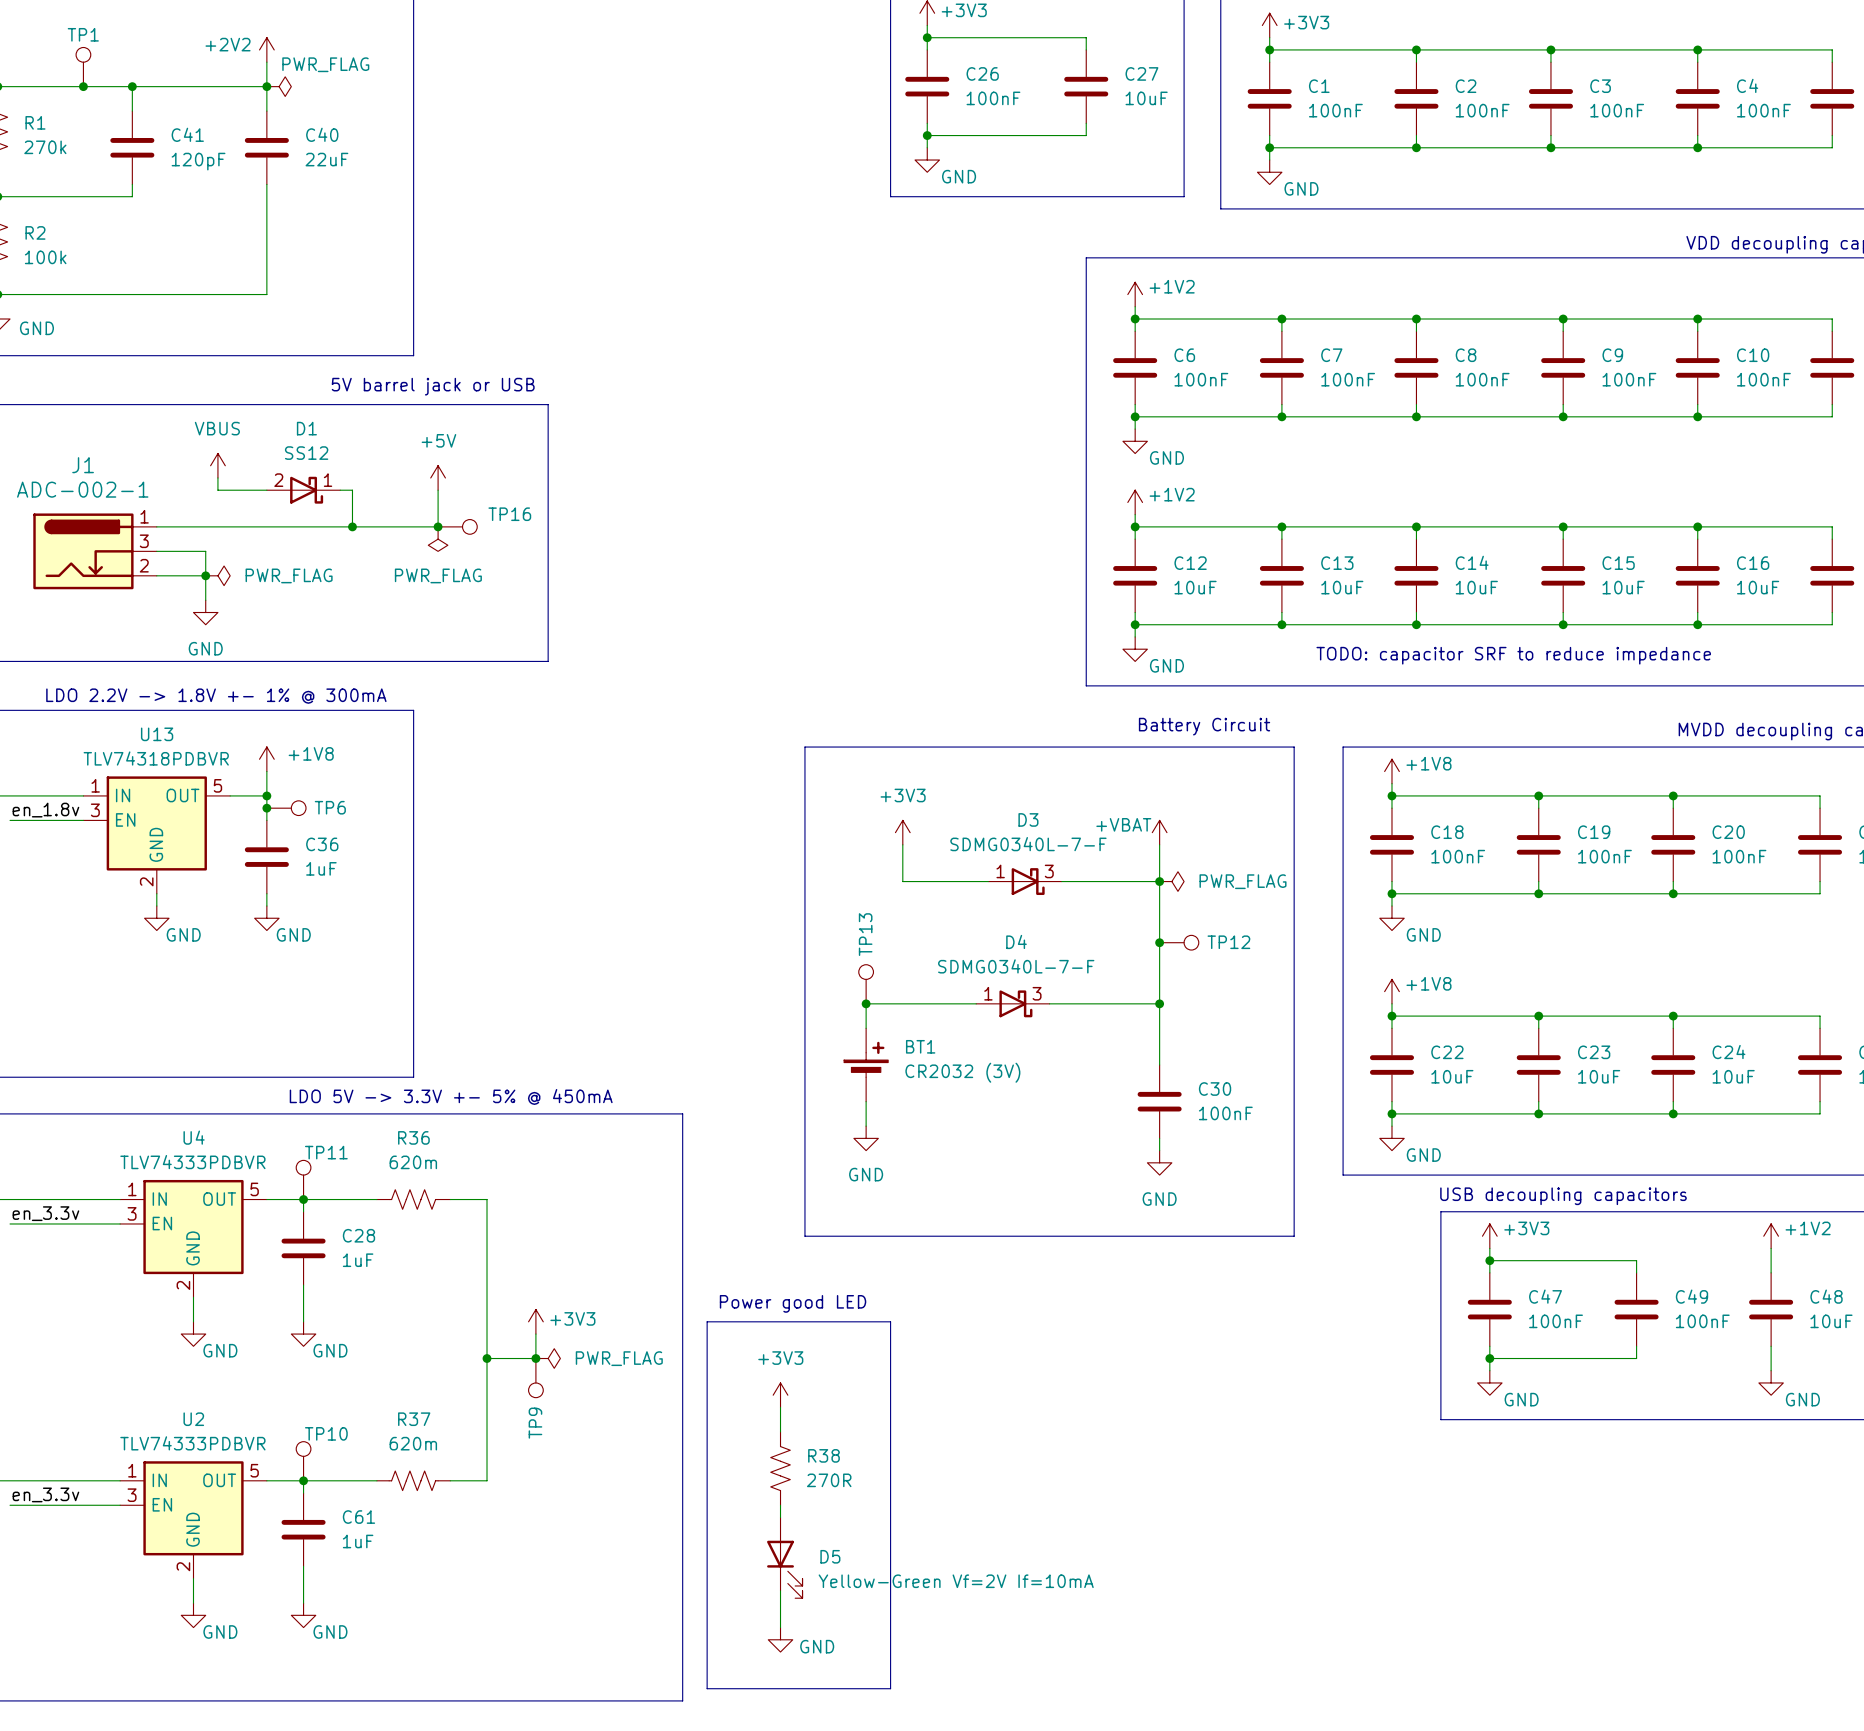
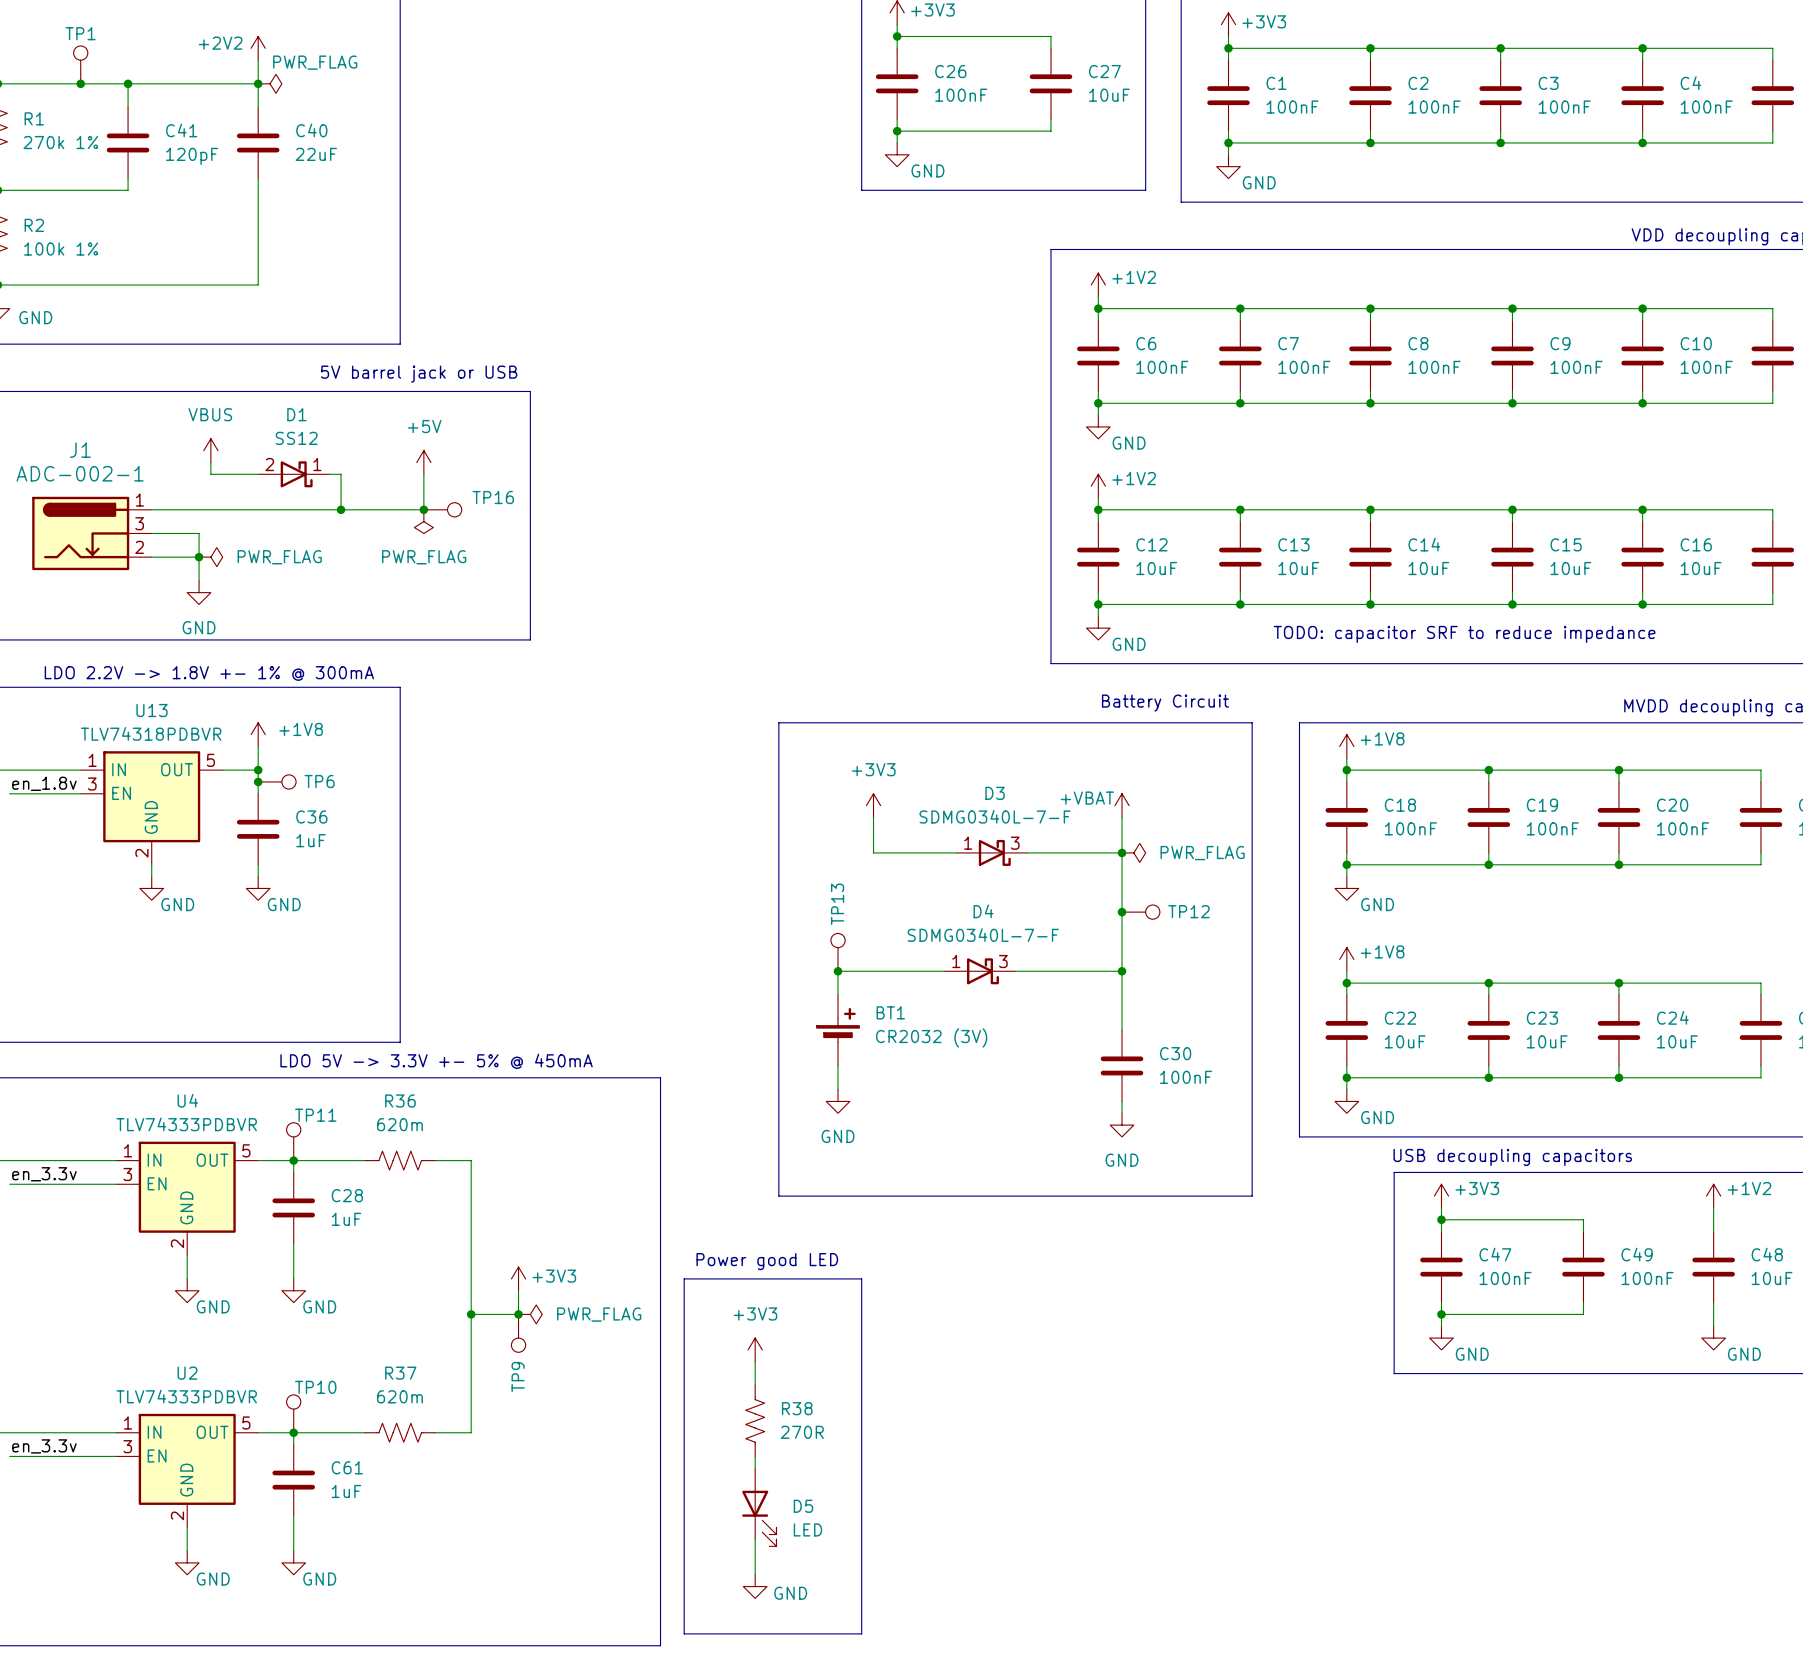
R1 value: 270k (45, 147) -> 270k 1% (60, 142)
R2 value: 100k (45, 257) -> 100k 1% (61, 249)
D5 value: Yellow-Green Vf=2V If=10mA (956, 1581) -> LED (807, 1529)

